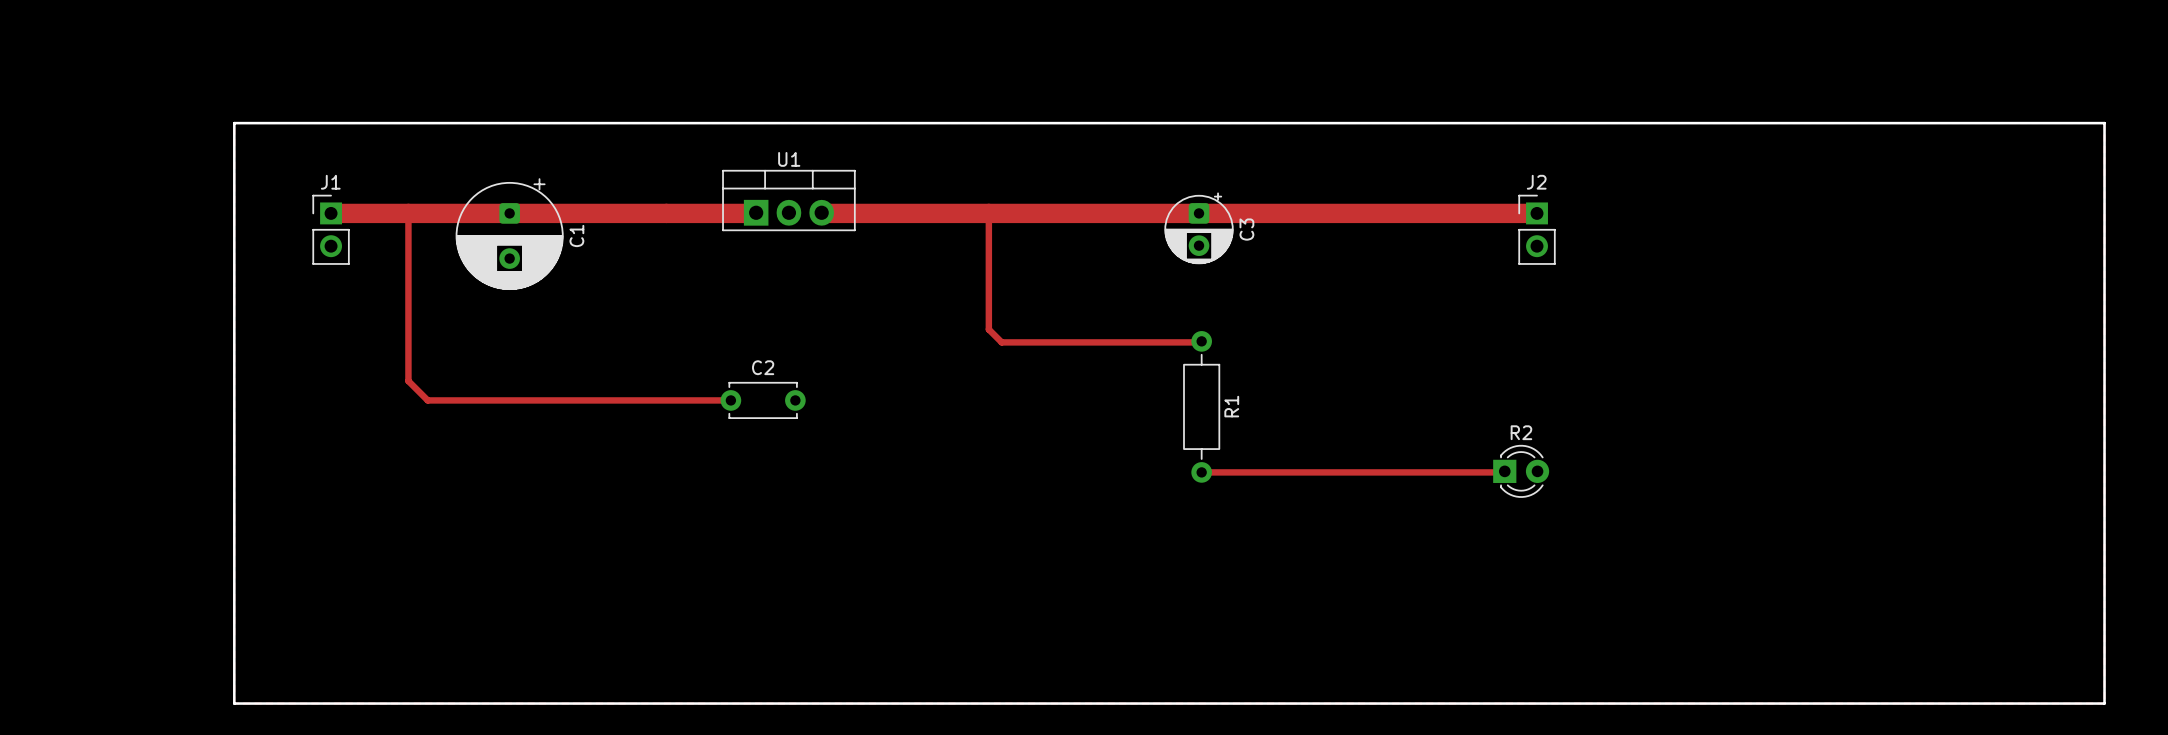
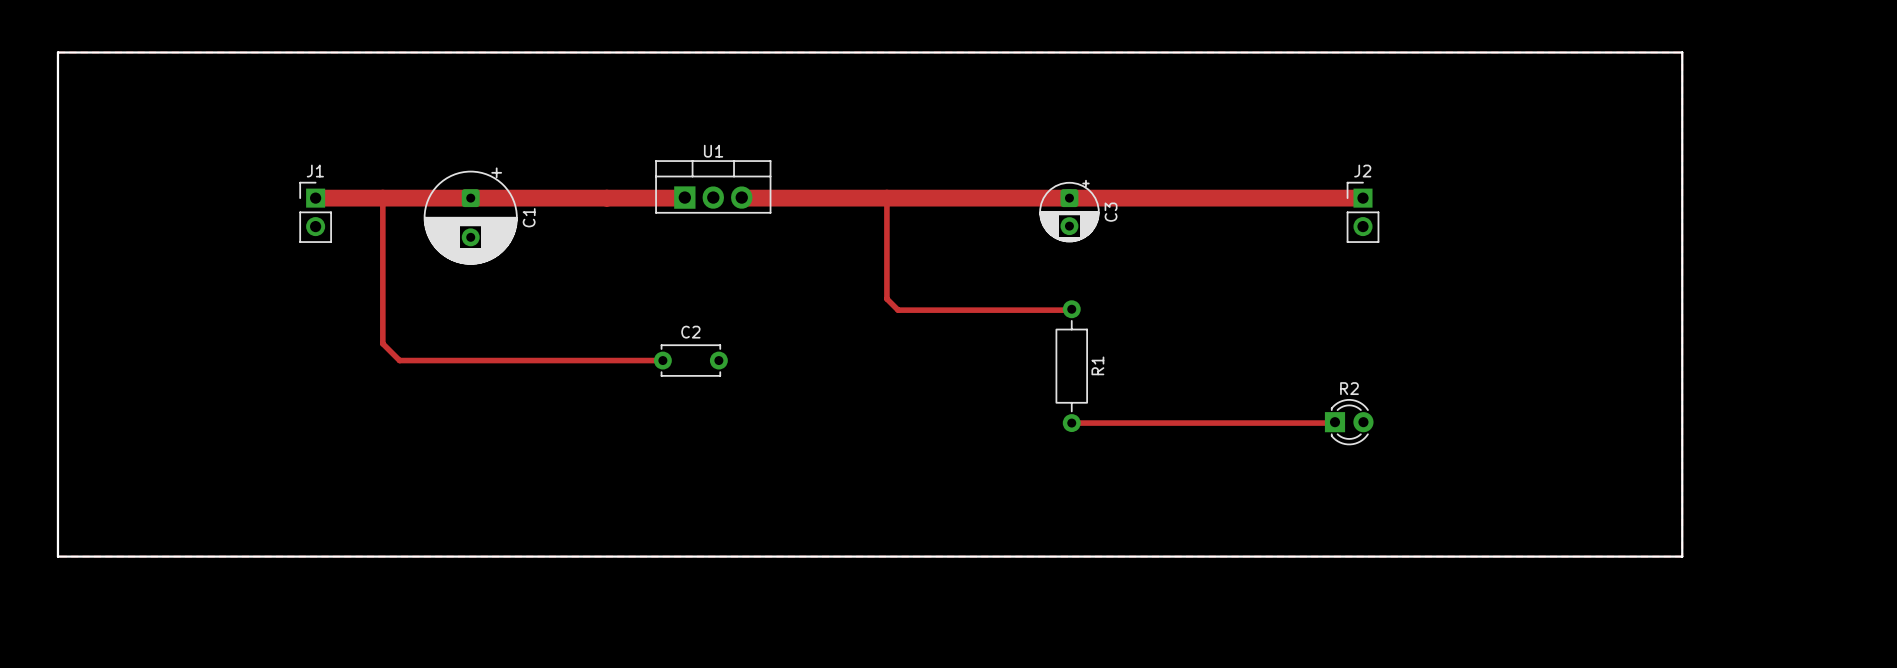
board edge: (234, 123) (2104, 123) (2104, 703) (234, 703) (234, 123) -> (57, 52) (57, 556) (1682, 556) (1682, 52) (57, 52)

